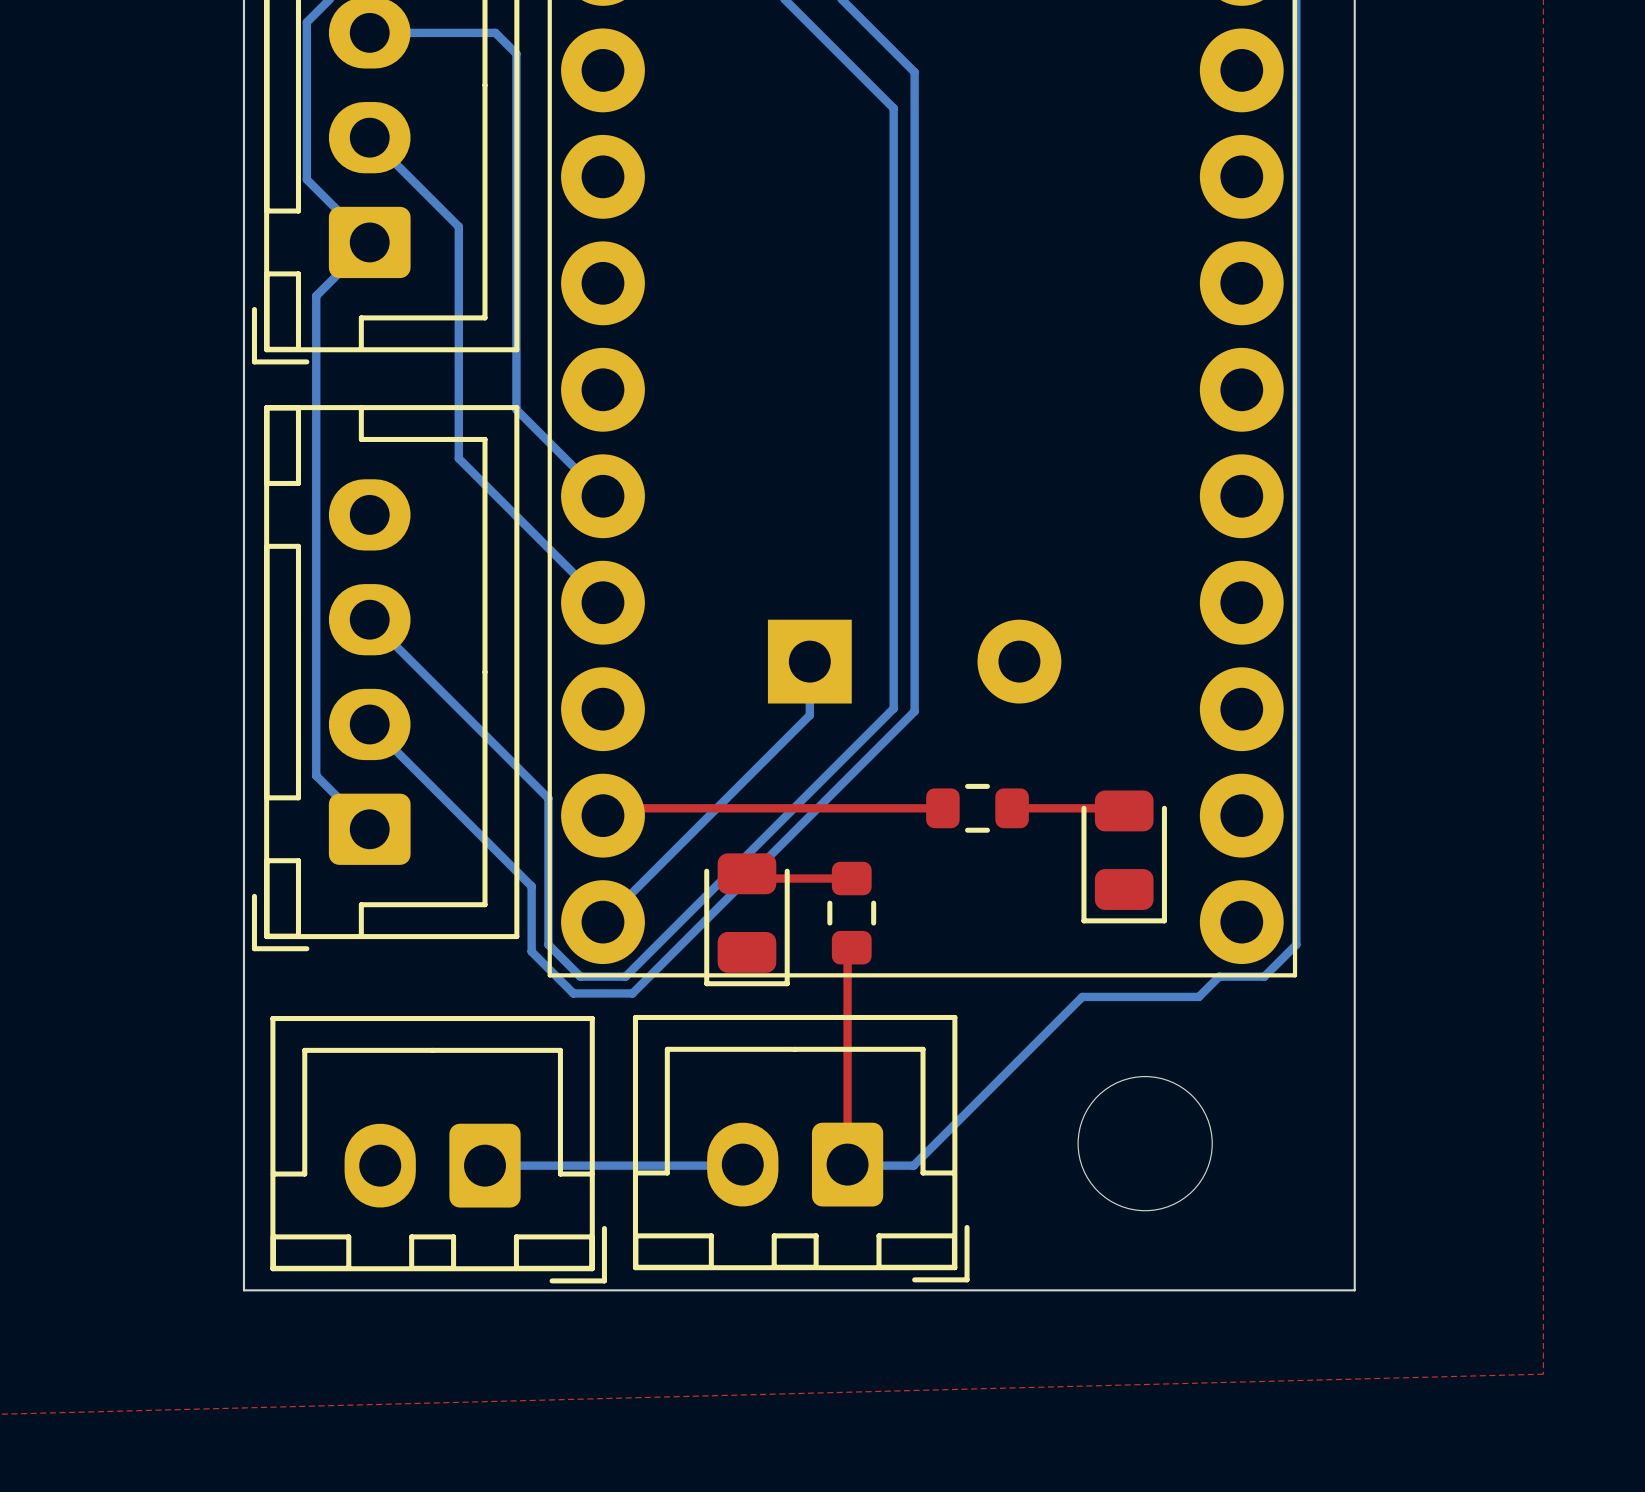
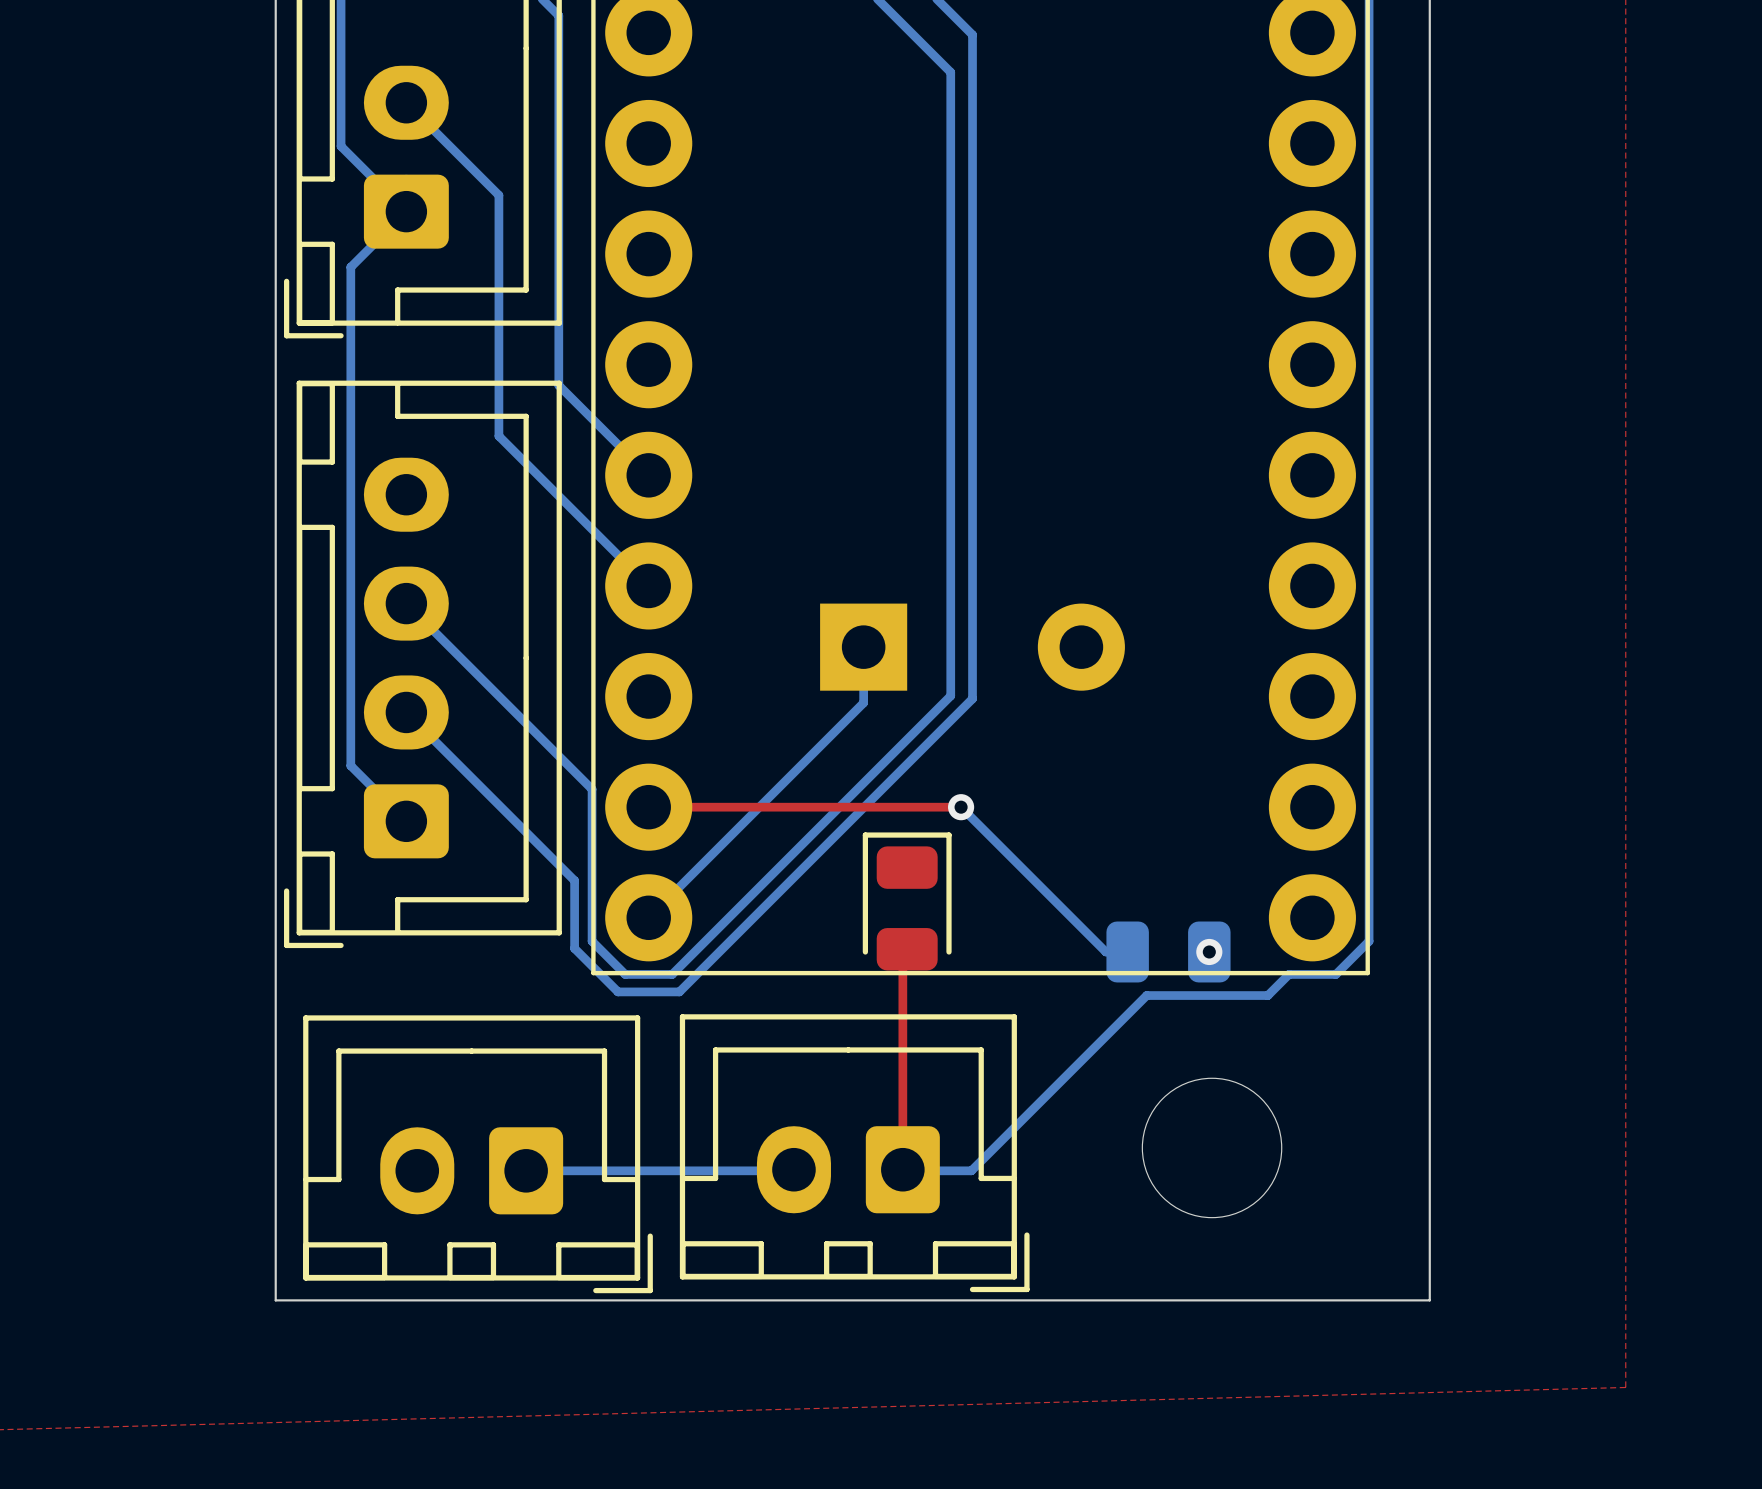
top track: (942, 808) (610, 808) (602, 815) -> (961, 807) (648, 807)
part: (977, 808) -> none
top track: (1012, 808) (1121, 808) (1124, 810) -> none
bottom track: none -> (961, 807) (1105, 951) (1127, 951)
via: none -> (961, 807)
part side: top (1124, 856) -> bottom (1168, 951)
part footprint: [827, 861, 877, 965] -> [862, 832, 952, 971]
top track: (746, 873) (751, 878) (851, 878) -> none
part: (746, 919) -> none
via: none -> (1209, 951)

